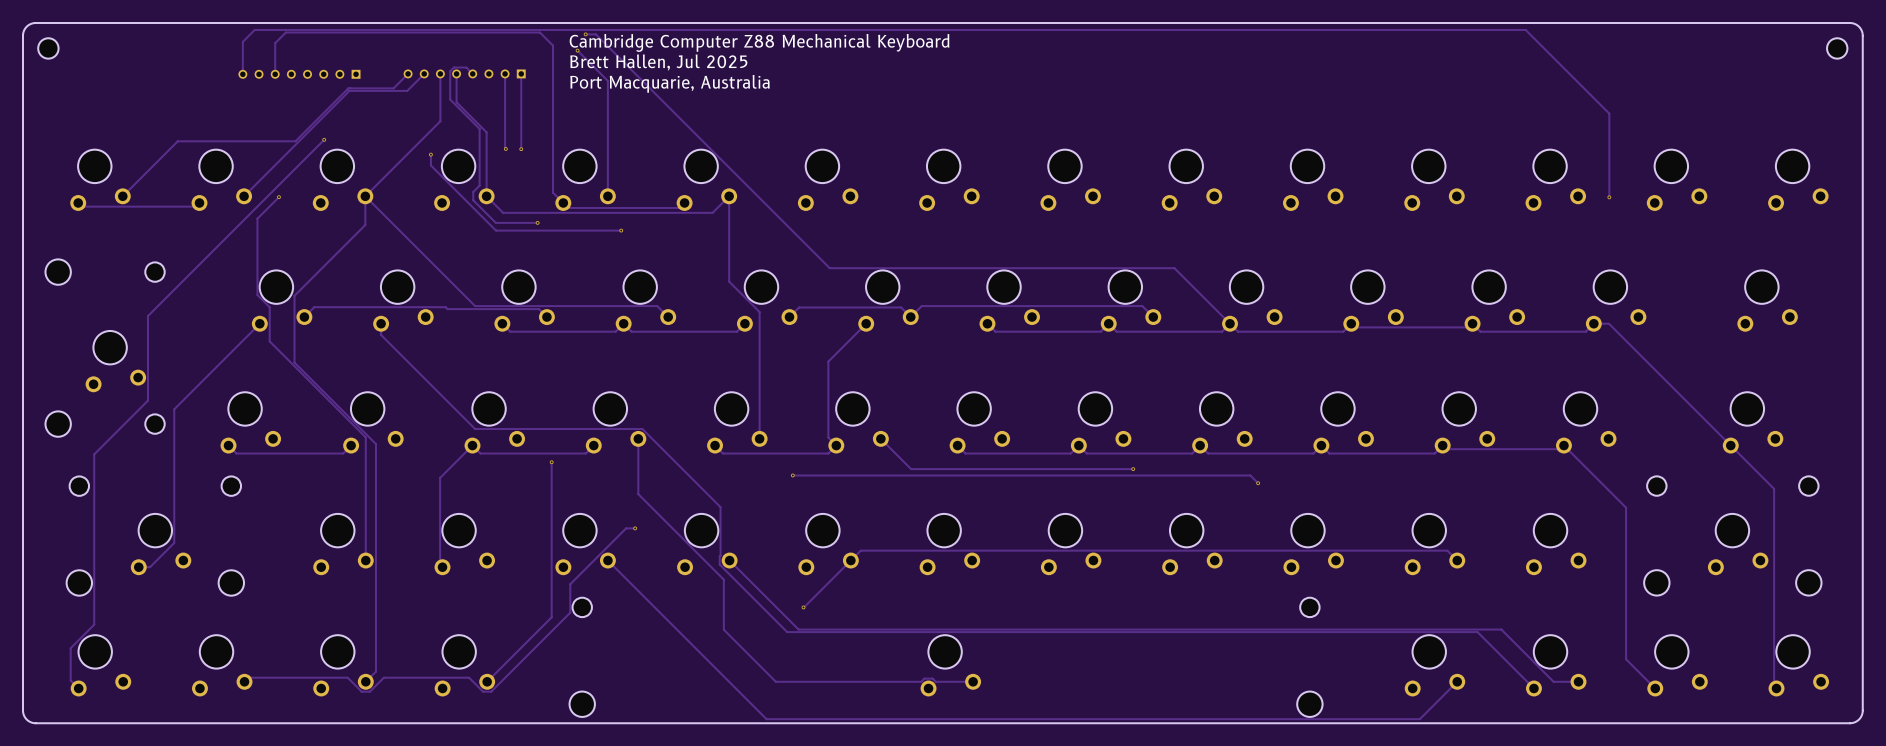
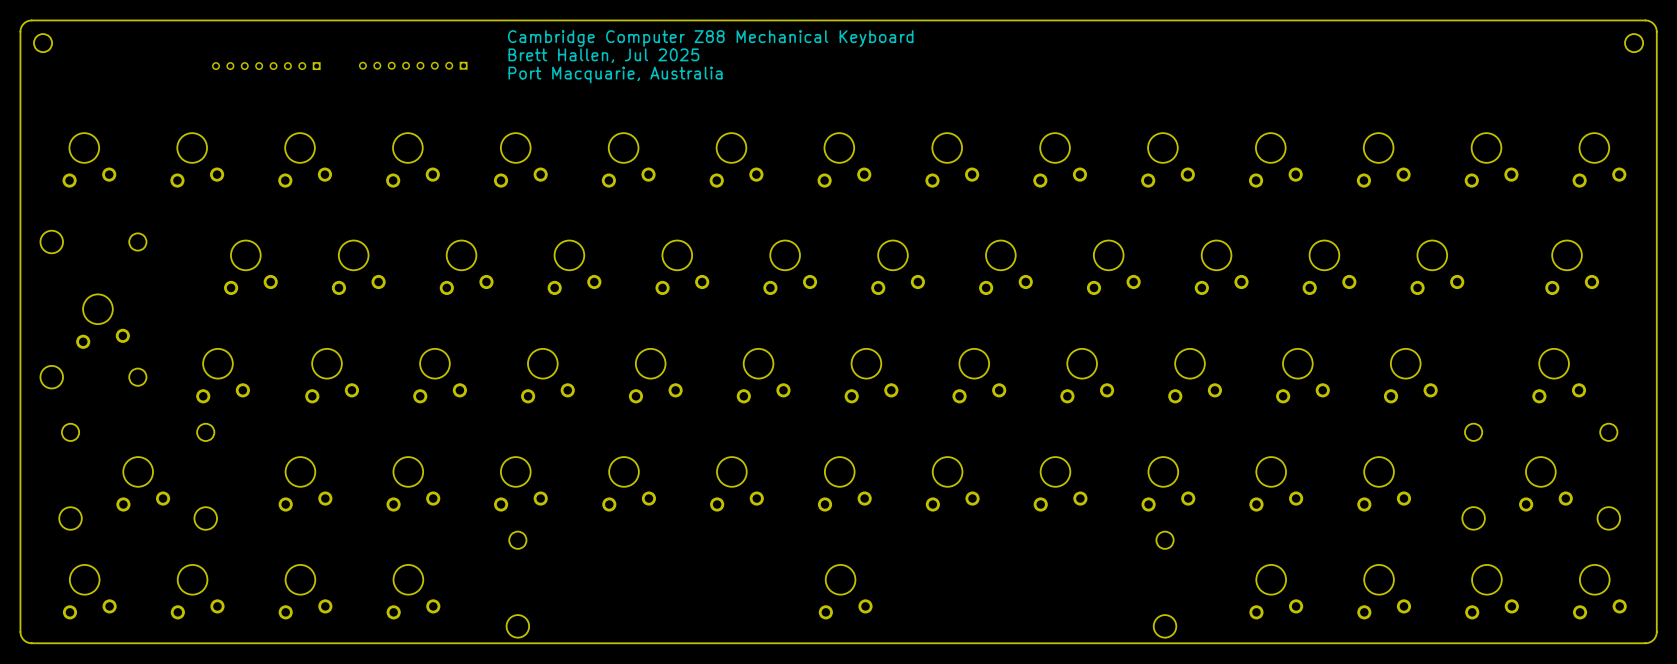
track: (585, 34) (595, 34) (829, 268) (1174, 268) (1237, 331) (1343, 331) (1351, 323) (1354, 327) (1468, 327) (1472, 323) (1480, 331) (1585, 331) (1593, 323) (1608, 323) (1774, 488) (1774, 686) (1776, 688) -> none
via: (585, 34) -> none
track: (577, 50) (607, 80) (607, 196) -> none
via: (577, 50) -> none
track: (408, 73) (393, 88) (348, 88) (295, 141) (177, 141) (122, 196) -> none
track: (424, 73) (407, 90) (349, 90) (244, 196) -> none
track: (440, 73) (440, 121) (365, 196) -> none
track: (456, 73) (456, 102) (486, 132) (486, 196) (503, 212) (712, 212) (729, 196) (729, 281) (759, 312) (759, 438) -> none
track: (472, 73) (466, 67) (453, 67) (450, 71) (450, 99) (479, 128) (479, 185) (473, 192) (473, 200) (495, 222) (538, 222) -> none
track: (505, 73) (505, 148) -> none
track: (521, 73) (521, 149) -> none
track: (242, 74) (242, 41) (254, 29) (1525, 29) (1609, 113) (1609, 197) -> none
track: (275, 74) (275, 43) (285, 32) (539, 32) (553, 45) (553, 192) -> none
track: (324, 139) (148, 316) (148, 400) (94, 454) (94, 624) (70, 648) (70, 680) (78, 688) -> none
via: (324, 139) -> none
via: (505, 148) -> none
via: (521, 149) -> none
track: (430, 154) (430, 165) (496, 230) (621, 230) -> none
via: (430, 154) -> none
track: (552, 192) (568, 207) (679, 207) (684, 202) -> none
track: (365, 196) (365, 224) (294, 295) (294, 362) (375, 444) (375, 671) (365, 681) -> none
track: (365, 196) (475, 306) (657, 306) (668, 317) -> none
track: (278, 197) (257, 218) (257, 294) (269, 307) (269, 341) (365, 437) (365, 560) -> none
via: (278, 197) -> none
via: (1609, 197) -> none
track: (199, 202) (195, 206) (81, 206) (78, 202) -> none
via: (537, 222) -> none
via: (621, 230) -> none
track: (546, 317) (538, 309) (447, 309) (445, 307) (314, 307) (304, 317) -> none
track: (1153, 317) (1142, 306) (921, 306) (910, 317) (901, 307) (799, 307) (789, 317) -> none
track: (259, 323) (174, 409) (174, 542) (150, 567) (138, 567) -> none
track: (381, 323) (381, 334) (475, 429) (642, 429) (720, 507) (719, 564) (787, 632) (1477, 632) (1533, 688) -> none
track: (744, 323) (736, 331) (631, 331) (623, 323) (615, 331) (510, 331) (502, 323) -> none
track: (866, 323) (828, 361) (828, 437) (836, 445) (828, 453) (723, 453) (715, 445) -> none
track: (1230, 323) (1222, 331) (1116, 331) (1108, 323) (1100, 331) (995, 331) (987, 323) -> none
track: (638, 438) (638, 494) (723, 579) (723, 629) (775, 681) (921, 681) (924, 678) (932, 678) (935, 681) (973, 681) -> none
track: (880, 438) (911, 469) (1133, 469) -> none
track: (351, 445) (343, 453) (236, 453) (228, 445) -> none
track: (593, 445) (585, 453) (480, 453) (472, 445) (440, 477) (440, 564) (442, 567) -> none
track: (957, 445) (965, 453) (1070, 453) (1078, 445) (1086, 453) (1192, 453) (1200, 445) (1208, 453) (1313, 453) (1321, 445) (1329, 453) (1434, 453) (1442, 445) (1446, 449) (1560, 449) (1563, 445) (1626, 507) (1626, 659) (1655, 688) -> none
track: (551, 462) (551, 617) (487, 681) -> none
via: (551, 462) -> none
via: (1133, 469) -> none
track: (792, 475) (1250, 475) (1258, 483) -> none
via: (792, 475) -> none
via: (1258, 483) -> none
track: (635, 528) (626, 528) (570, 584) (570, 612) (491, 691) (483, 691) (469, 677) (383, 677) (369, 691) (361, 691) (347, 677) (248, 677) (244, 681) -> none
via: (635, 528) -> none
track: (607, 560) (766, 719) (1419, 719) (1457, 681) -> none
track: (729, 560) (798, 629) (1501, 629) (1553, 681) (1578, 681) -> none
track: (1457, 560) (1447, 550) (860, 550) (803, 607) -> none
via: (803, 607) -> none

